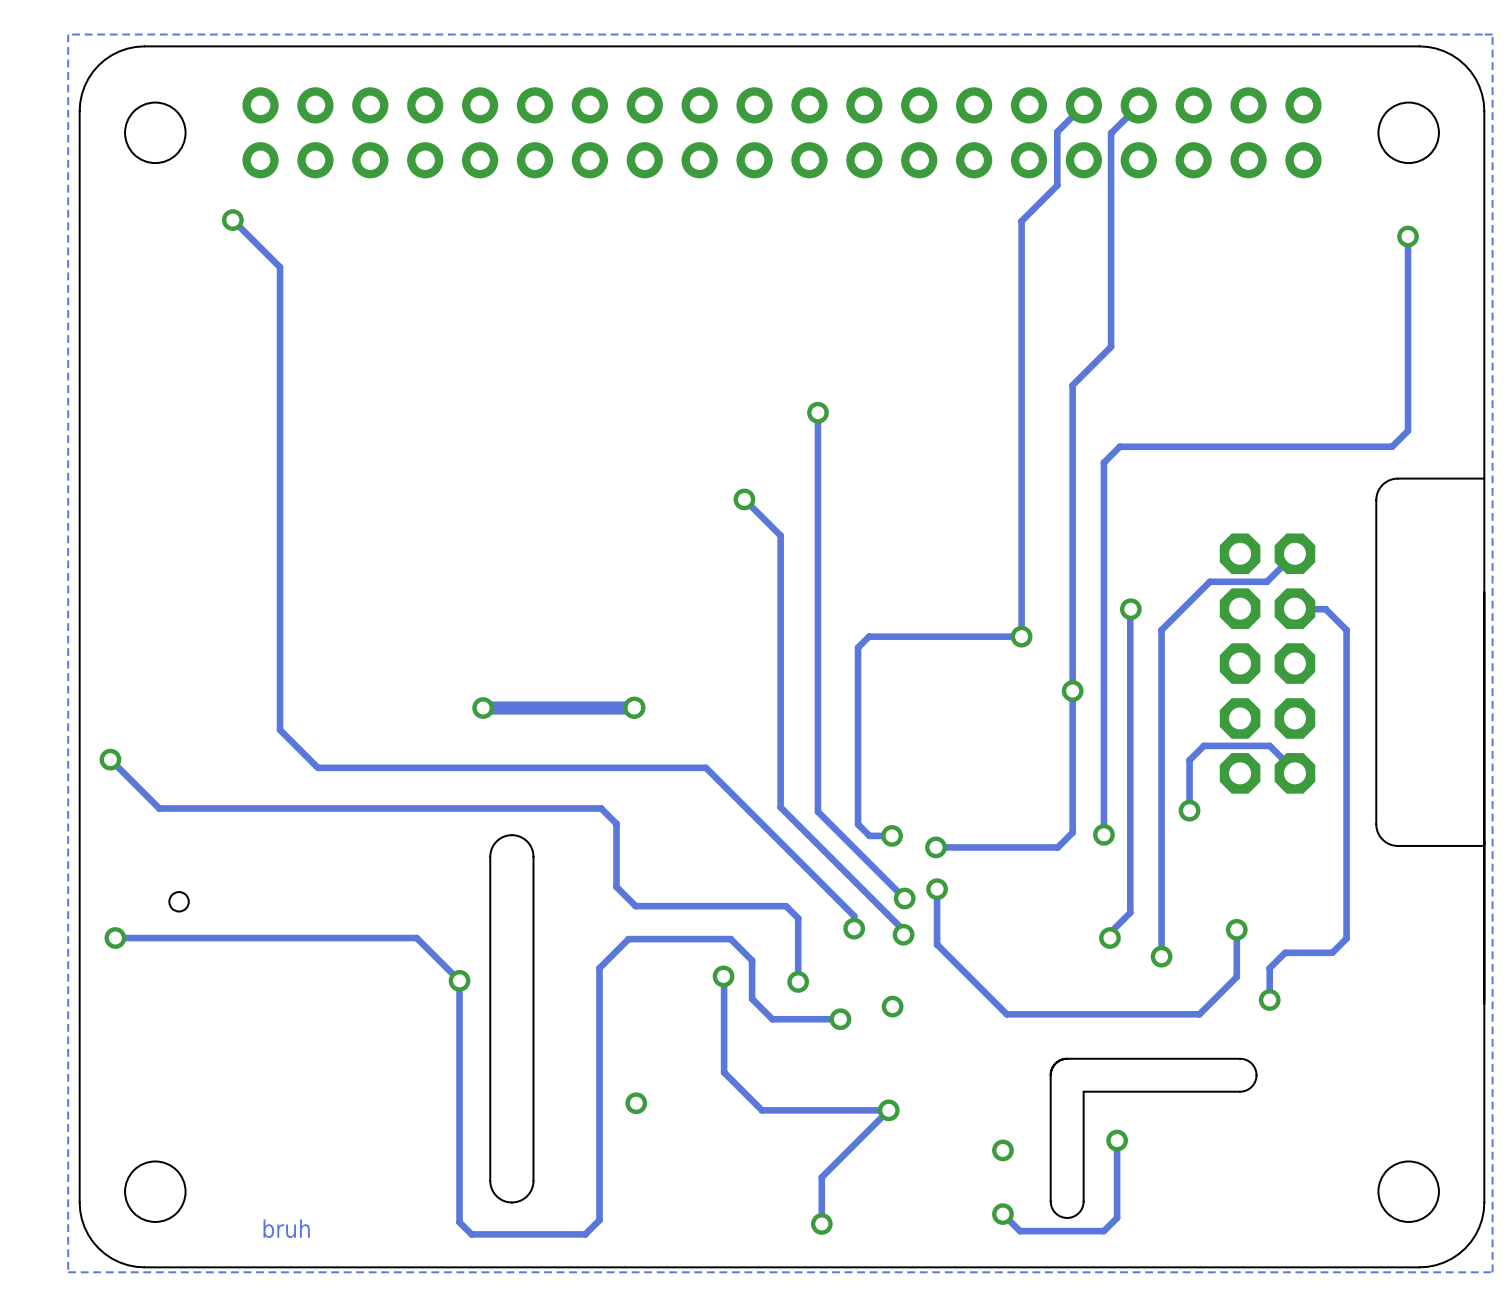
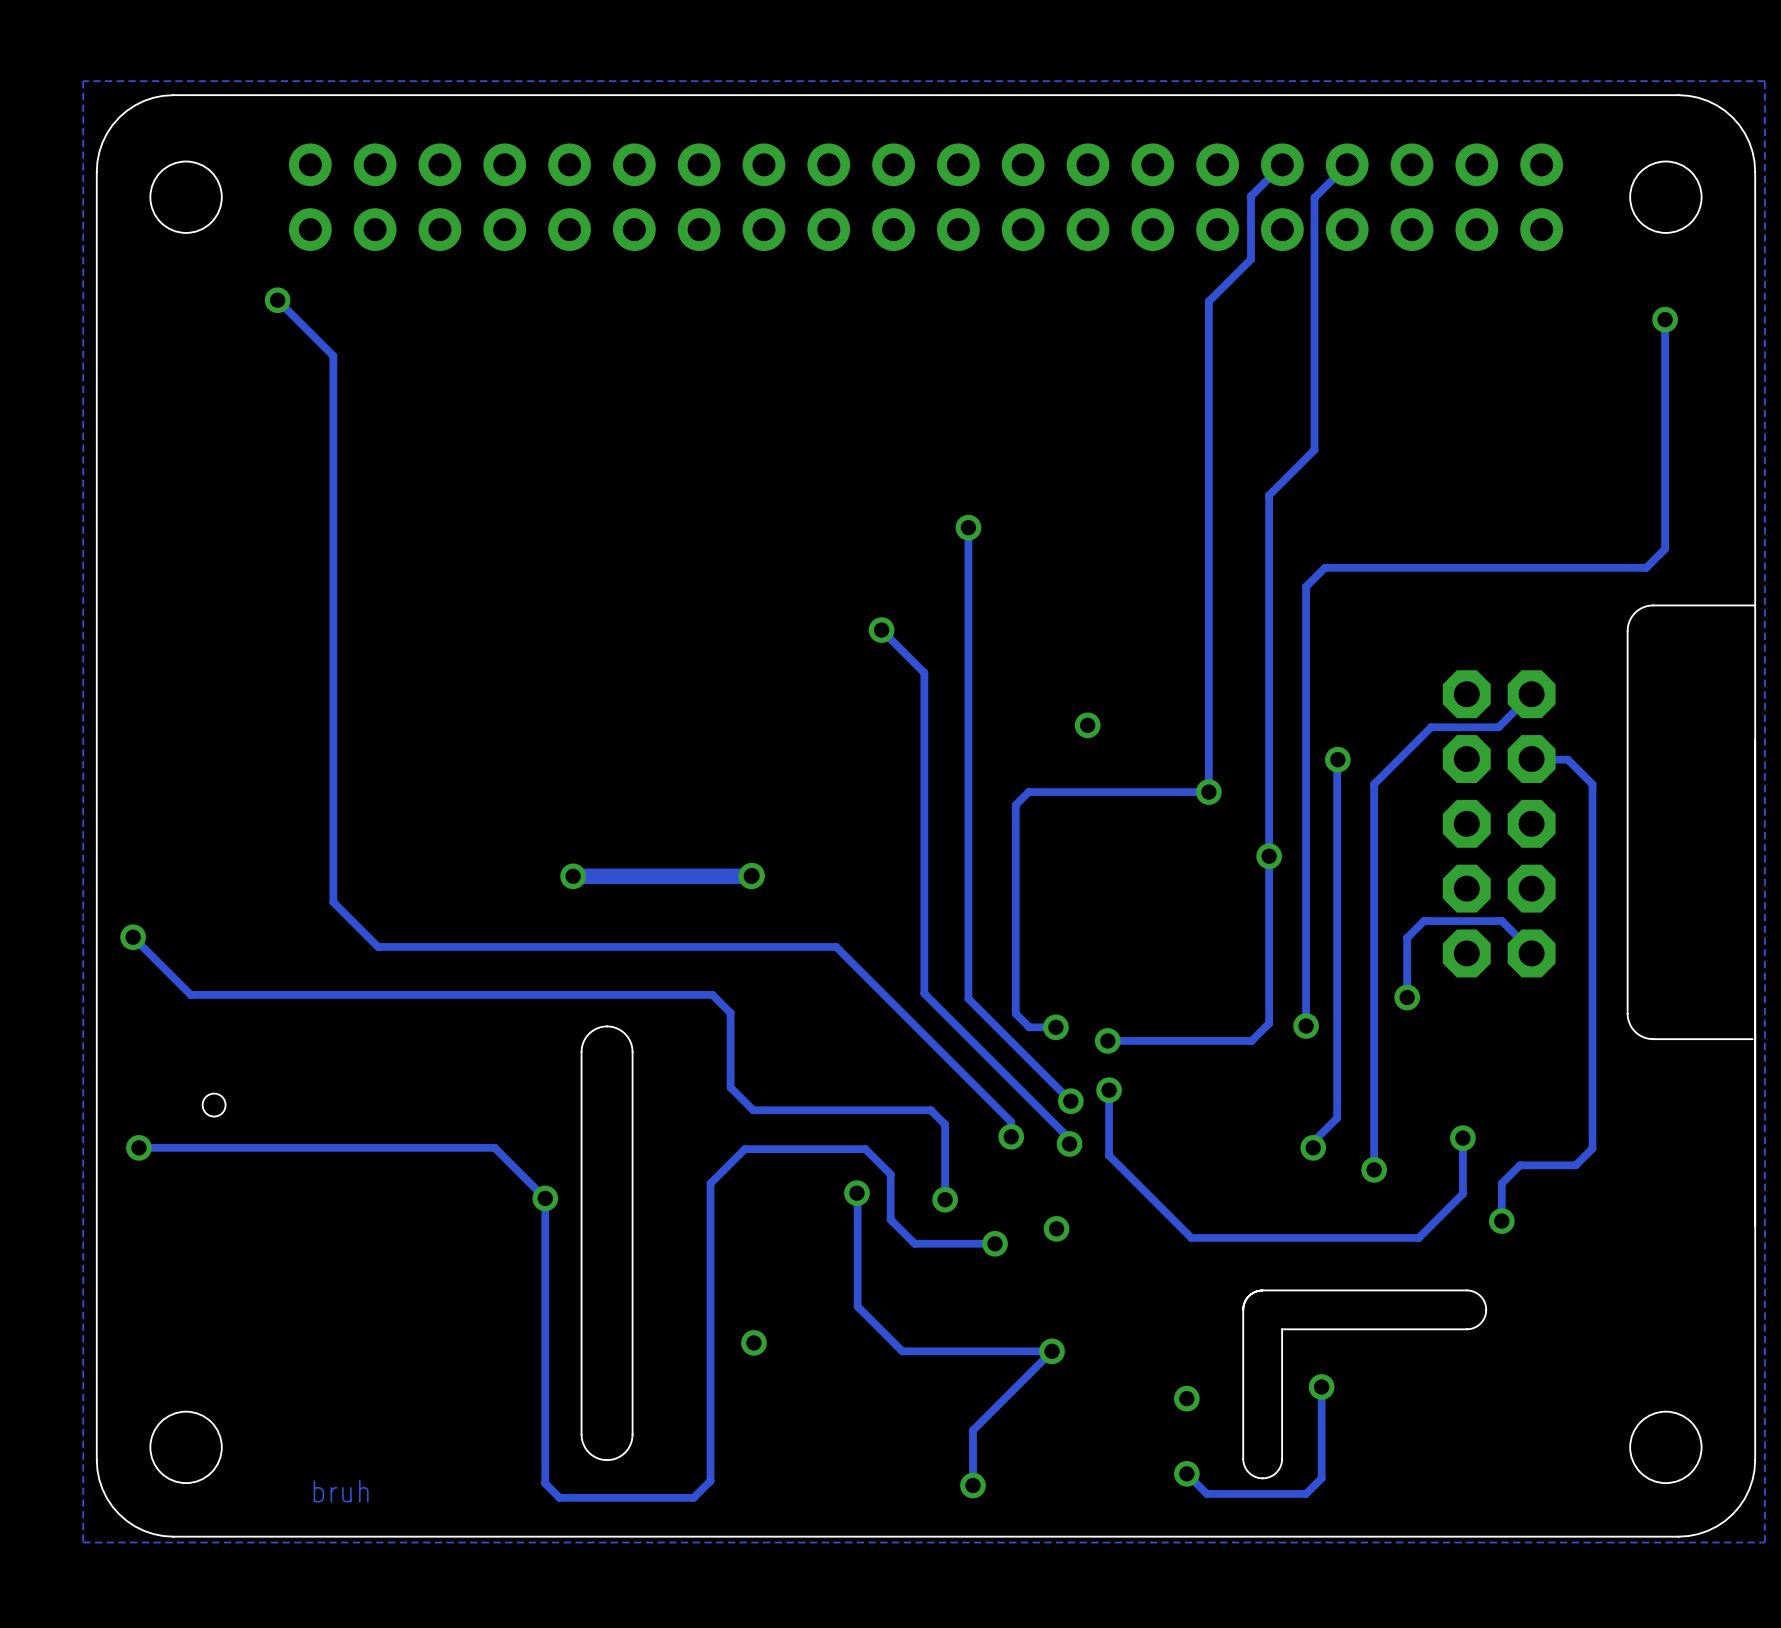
via: none -> (1087, 725)

